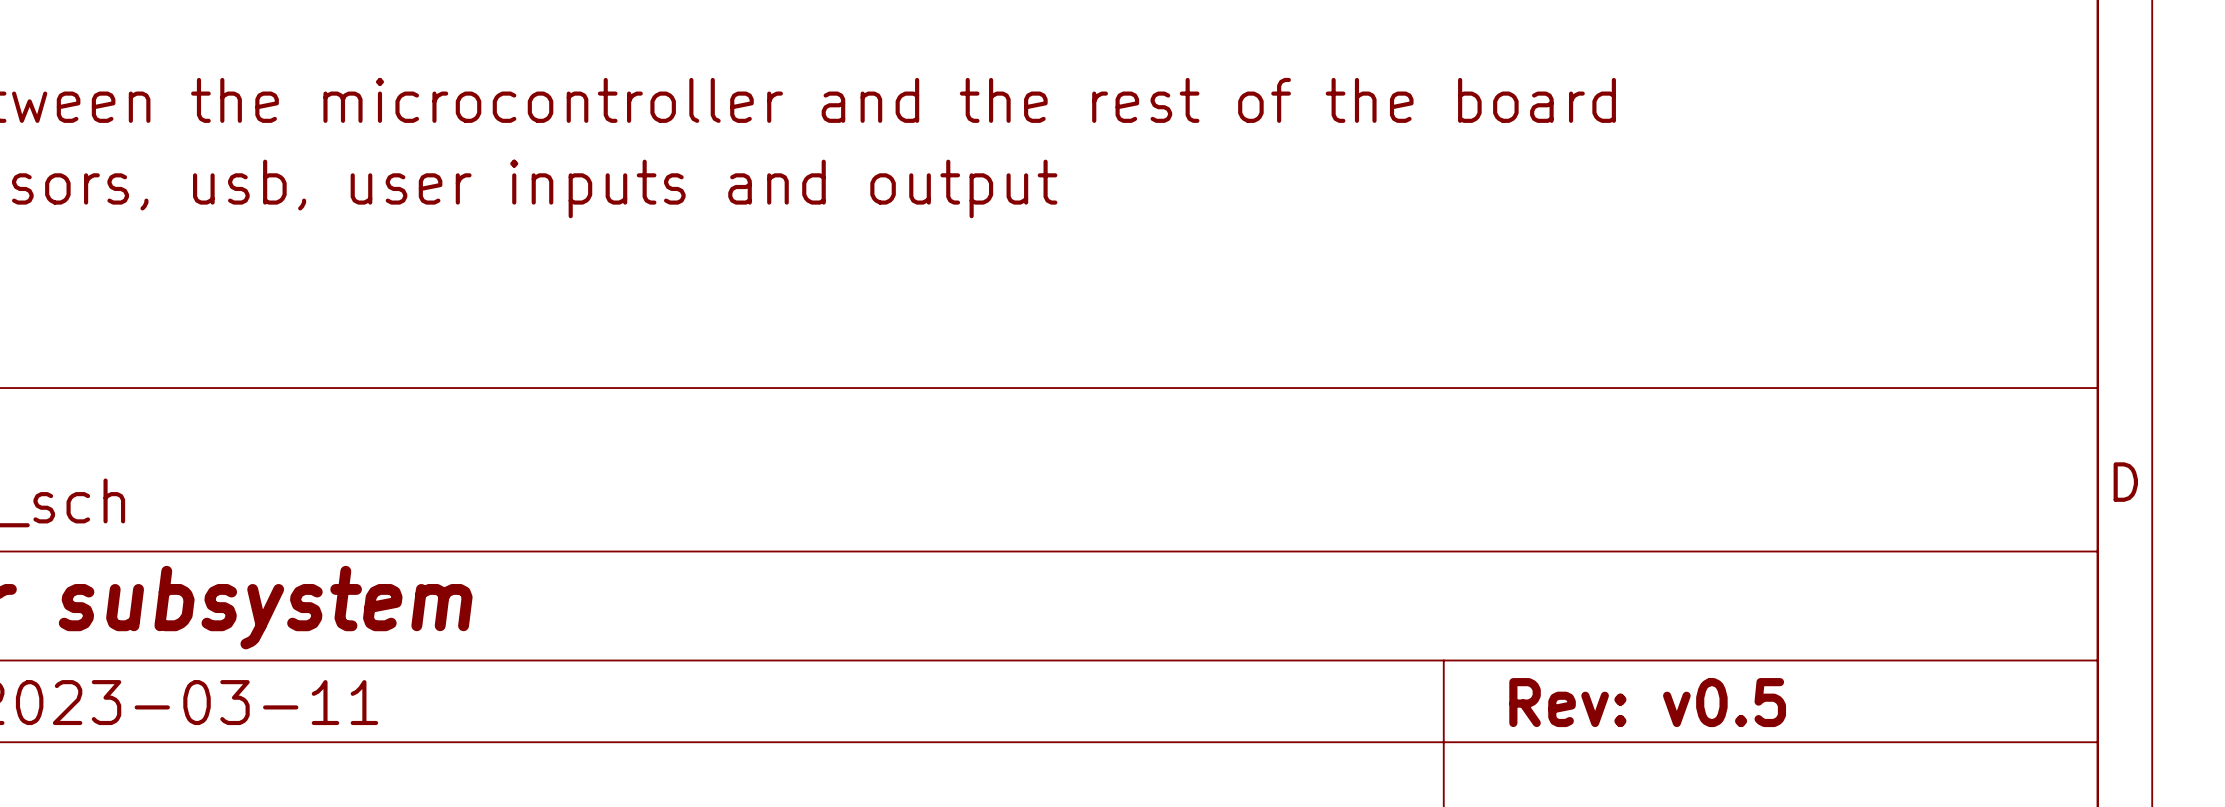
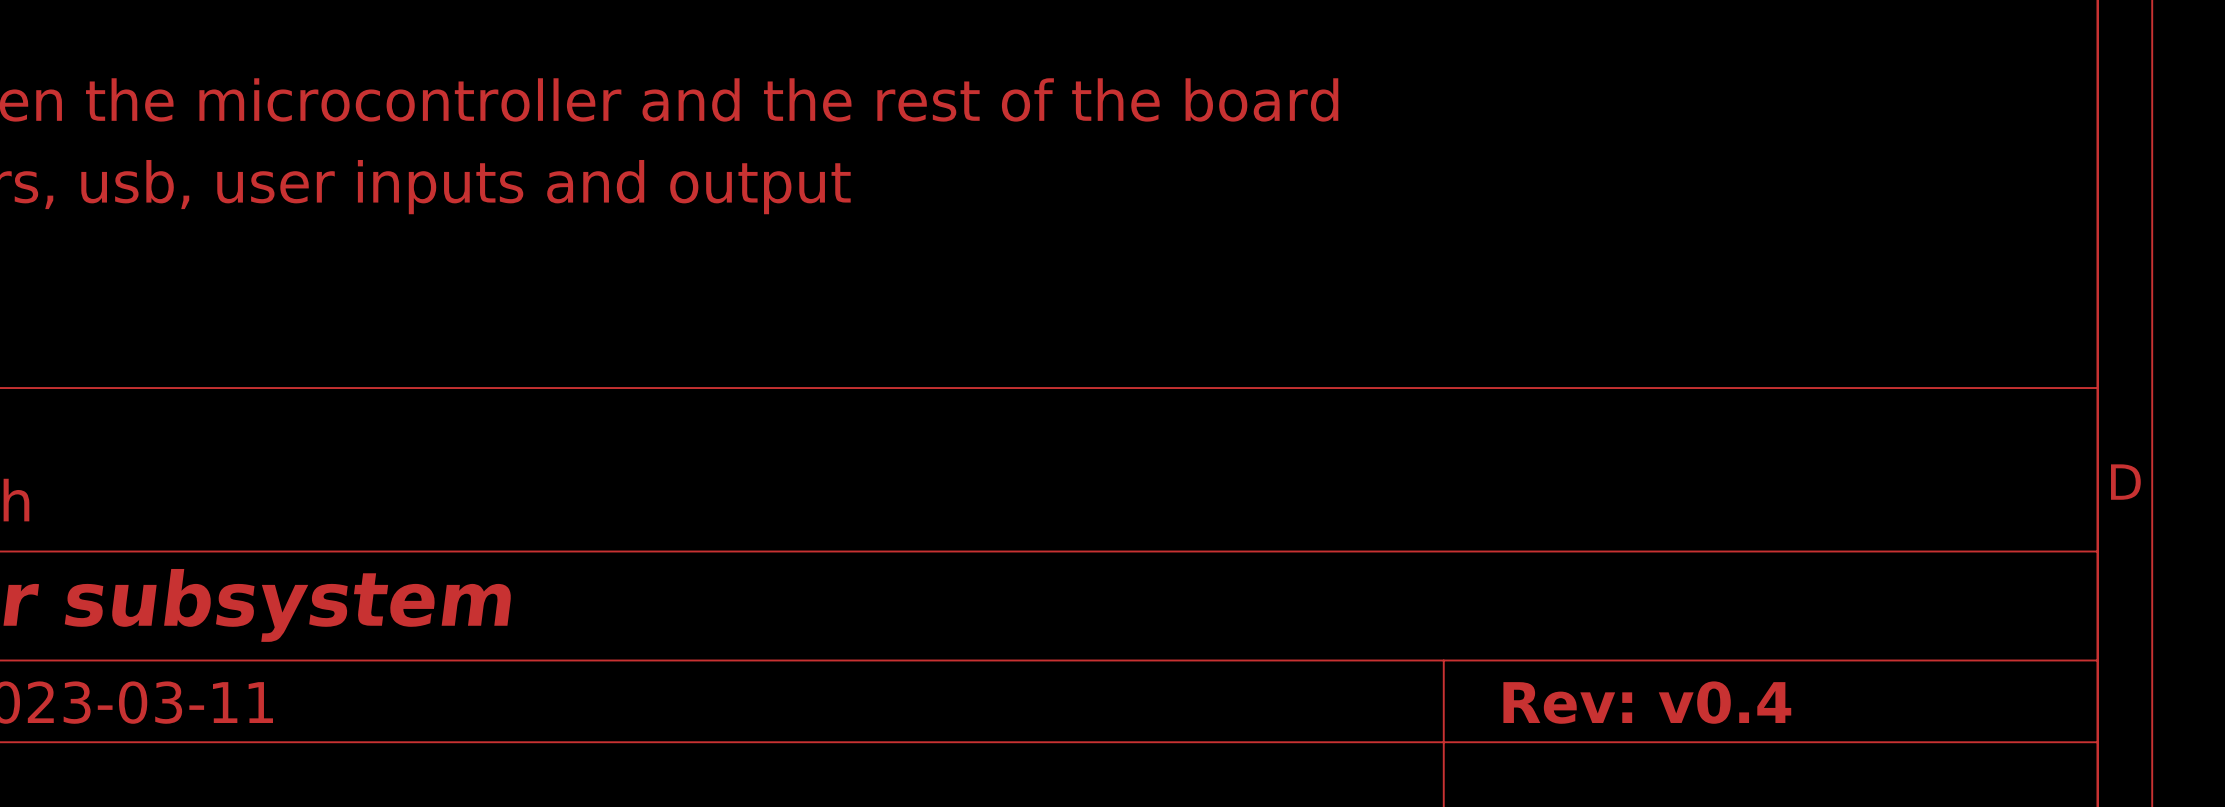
title block: Rev: v0.5 (1647, 702) -> Rev: v0.4 (1647, 702)

